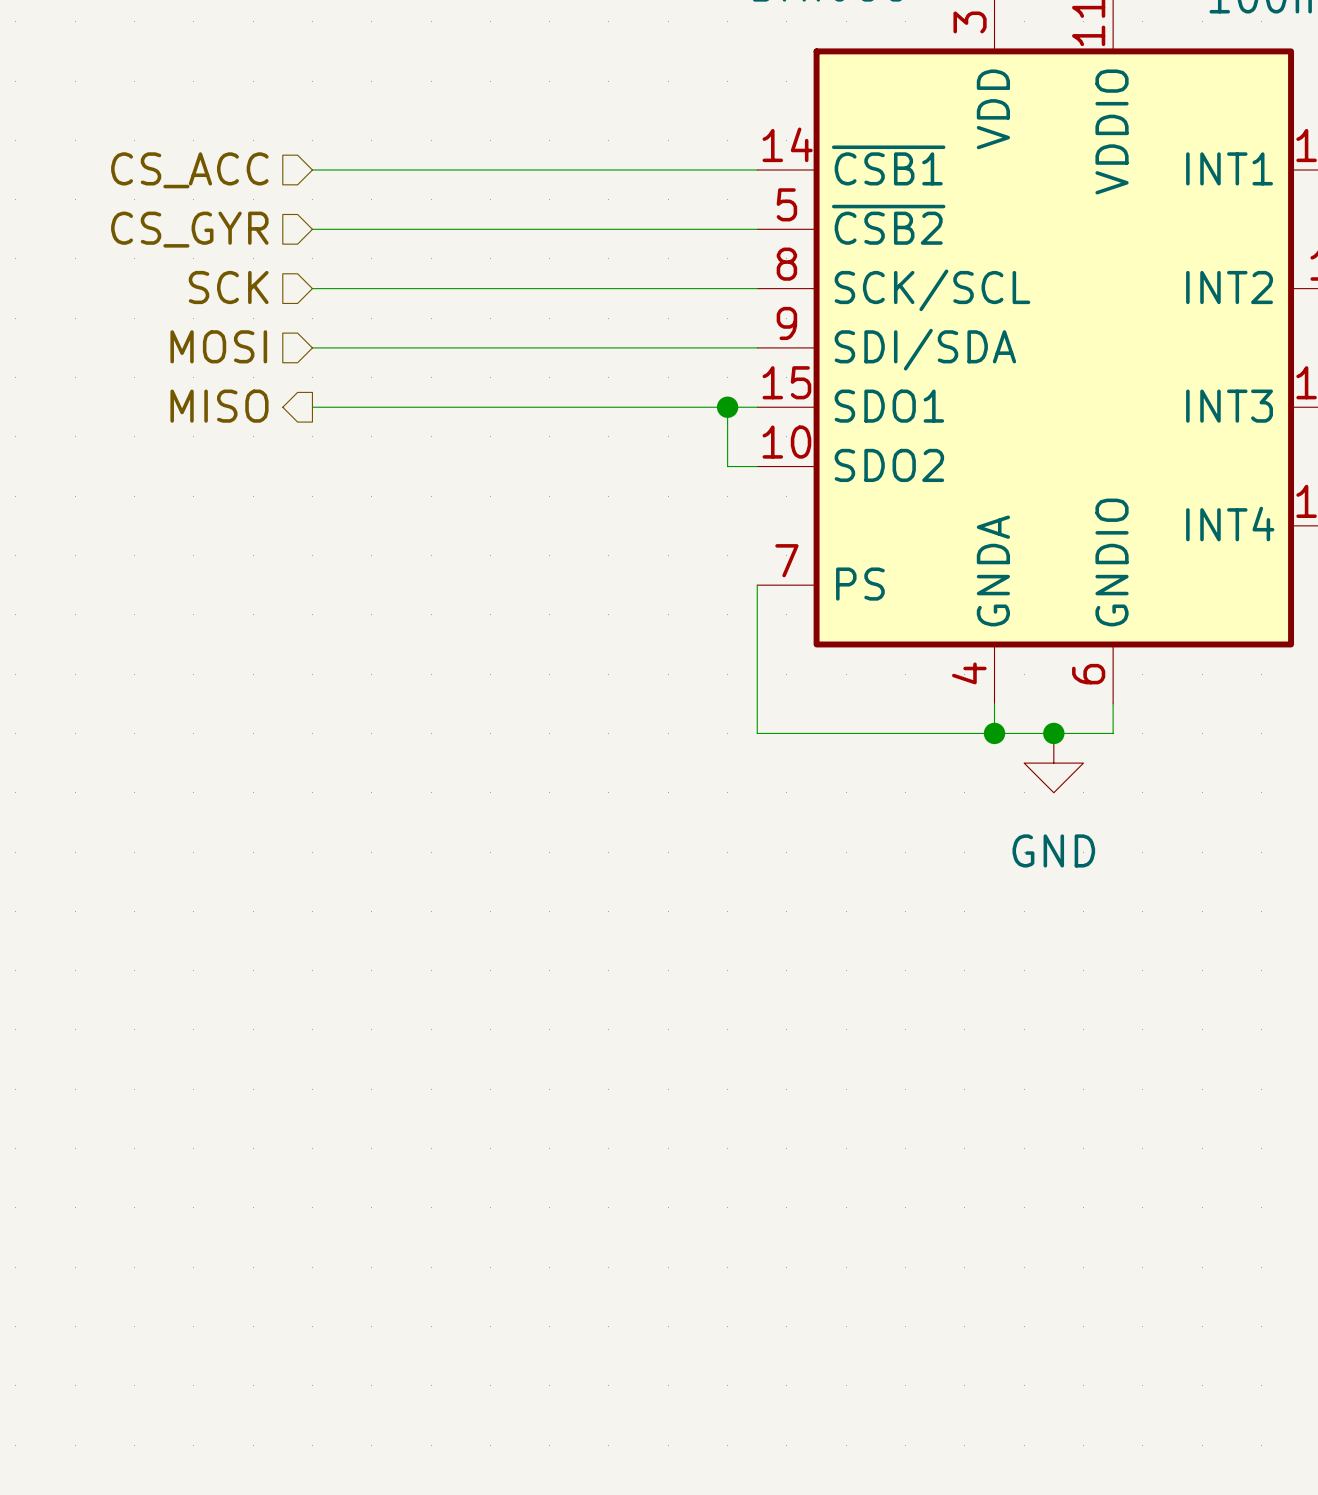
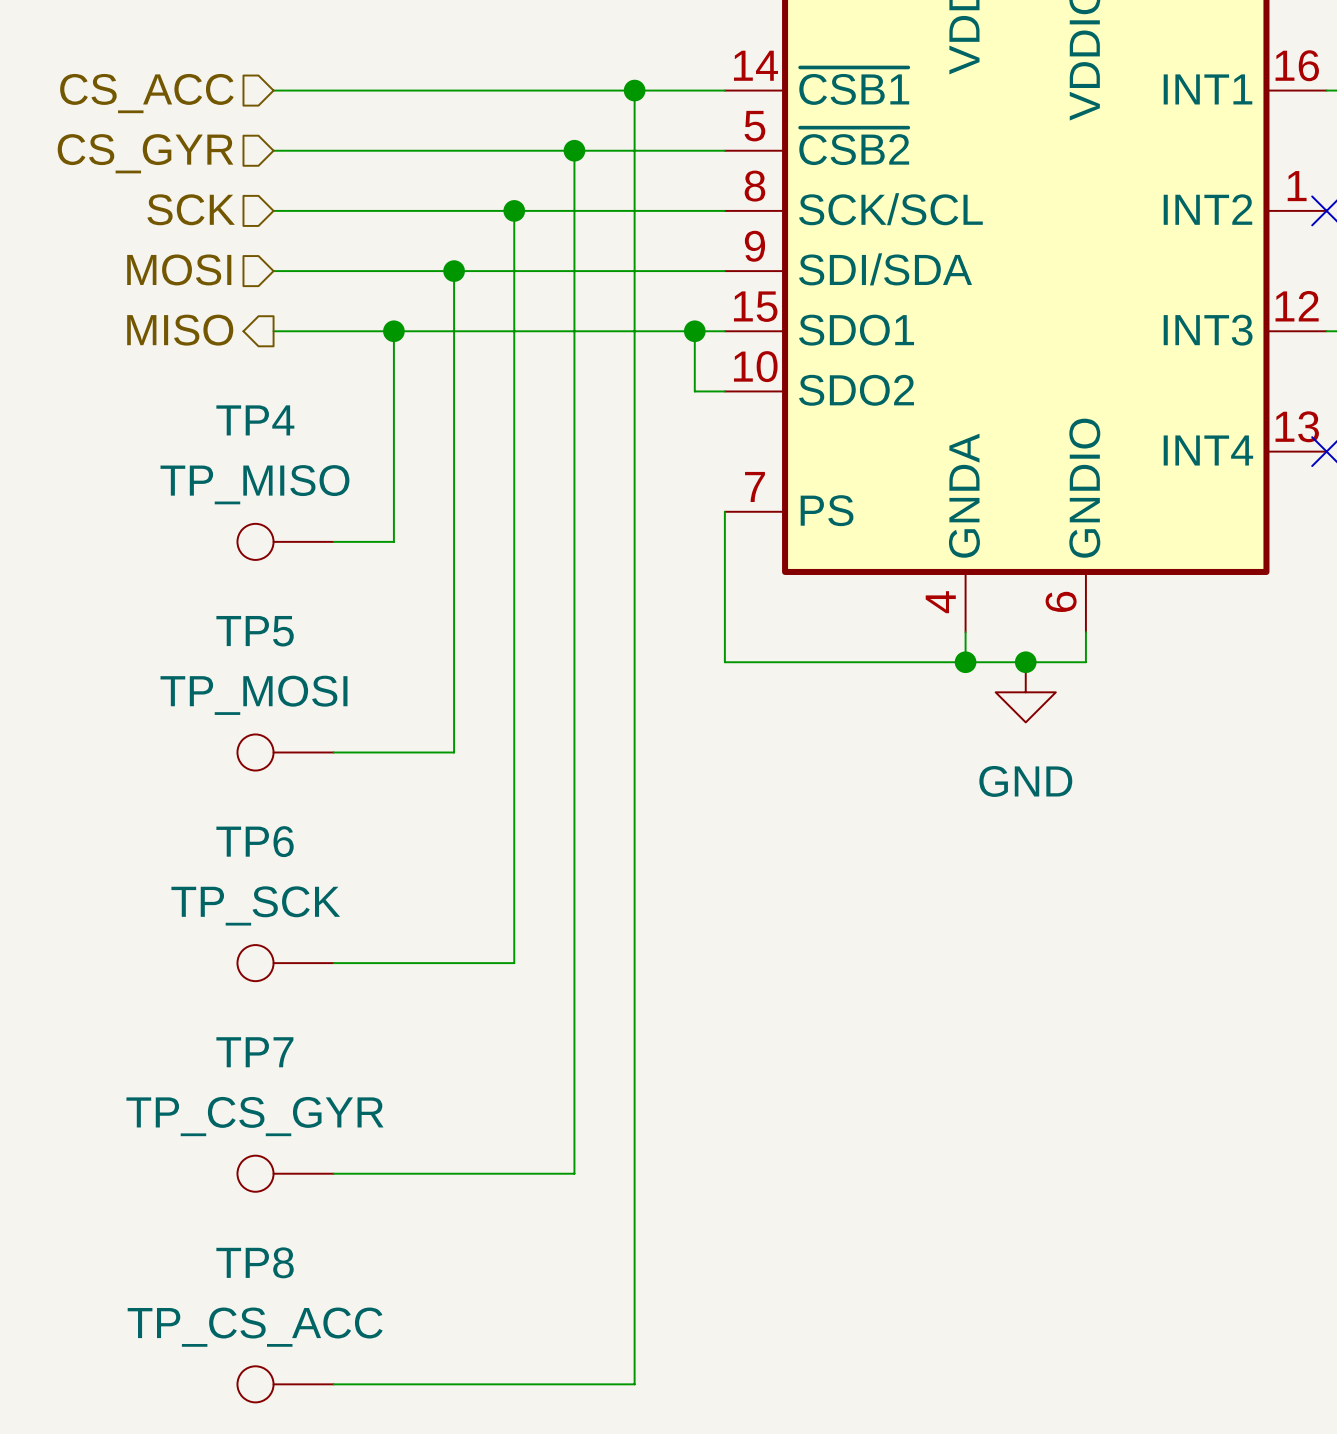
wire: none -> (634, 90) (634, 1384) (333, 1384)
junction: none -> (634, 90)
wire: none -> (574, 150) (574, 1173) (333, 1173)
junction: none -> (574, 150)
wire: none -> (514, 210) (514, 963) (333, 963)
junction: none -> (514, 210)
wire: none -> (454, 271) (454, 752) (333, 752)
junction: none -> (454, 271)
wire: none -> (393, 331) (393, 541) (333, 541)
junction: none -> (393, 331)
TP4: none -> TP_MISO (285, 541)
TP5: none -> TP_MOSI (285, 752)
TP6: none -> TP_SCK (285, 963)
TP7: none -> TP_CS_GYR (285, 1173)
TP8: none -> TP_CS_ACC (285, 1384)

